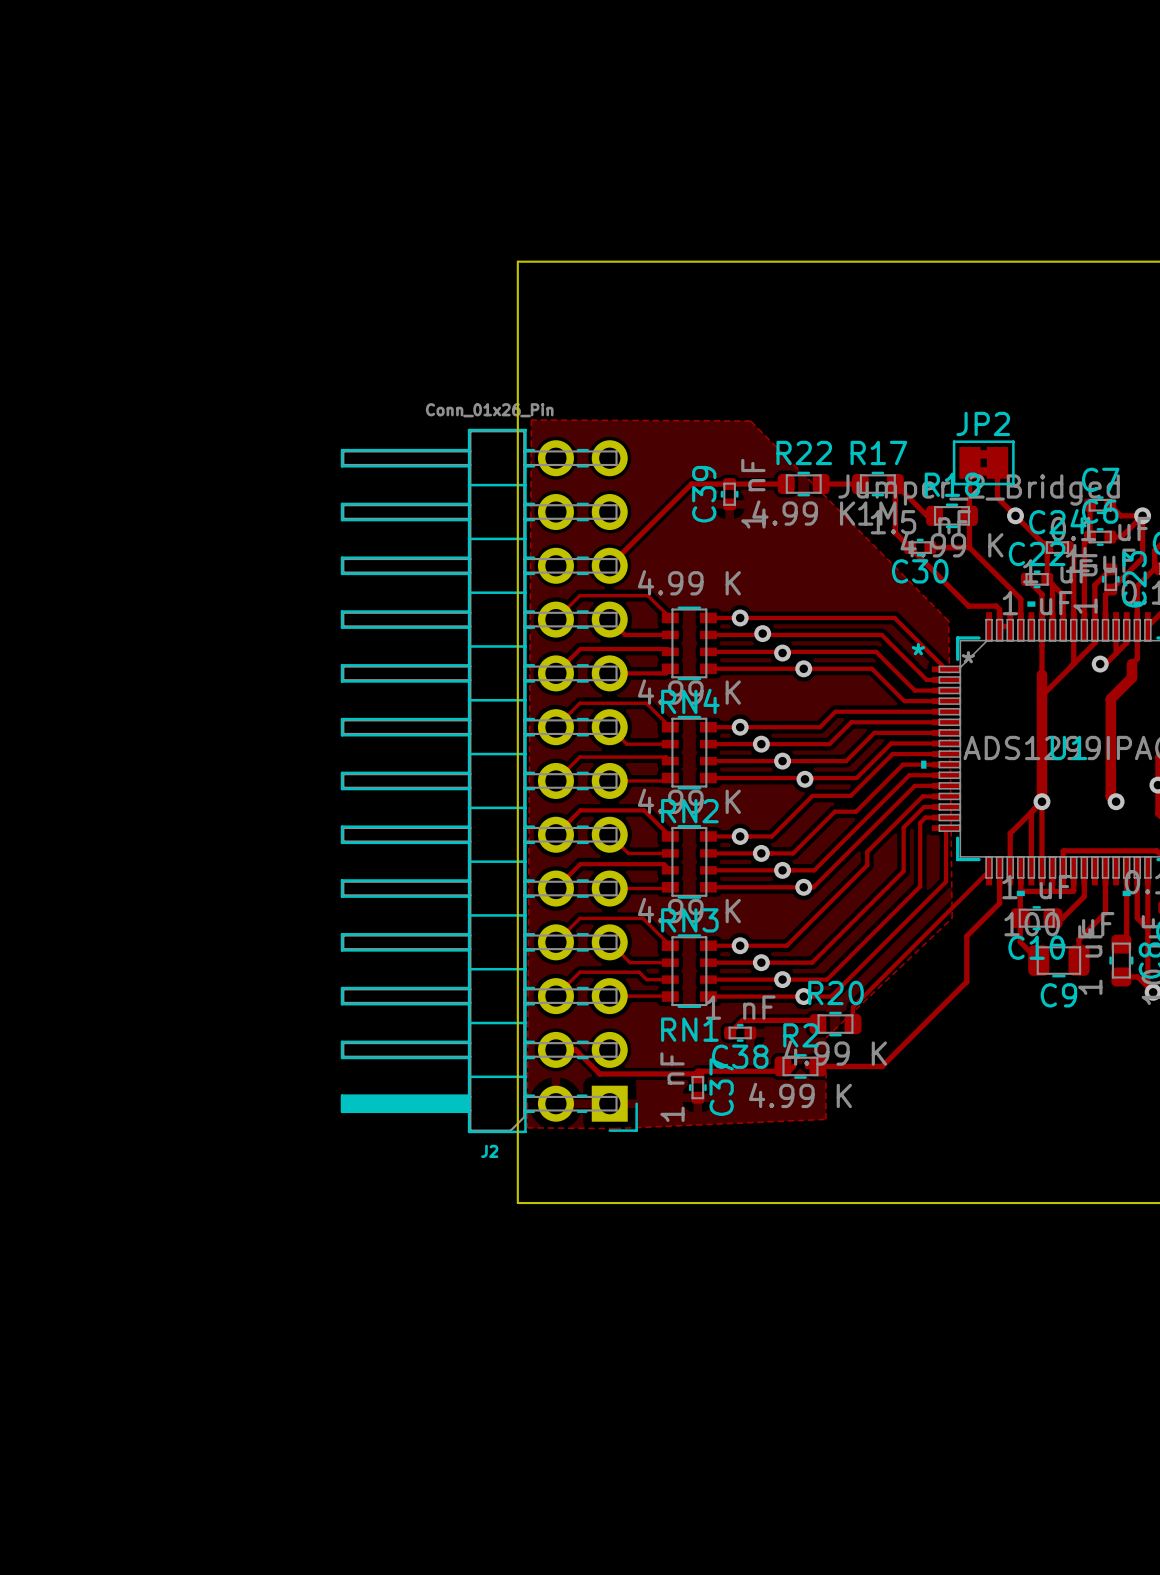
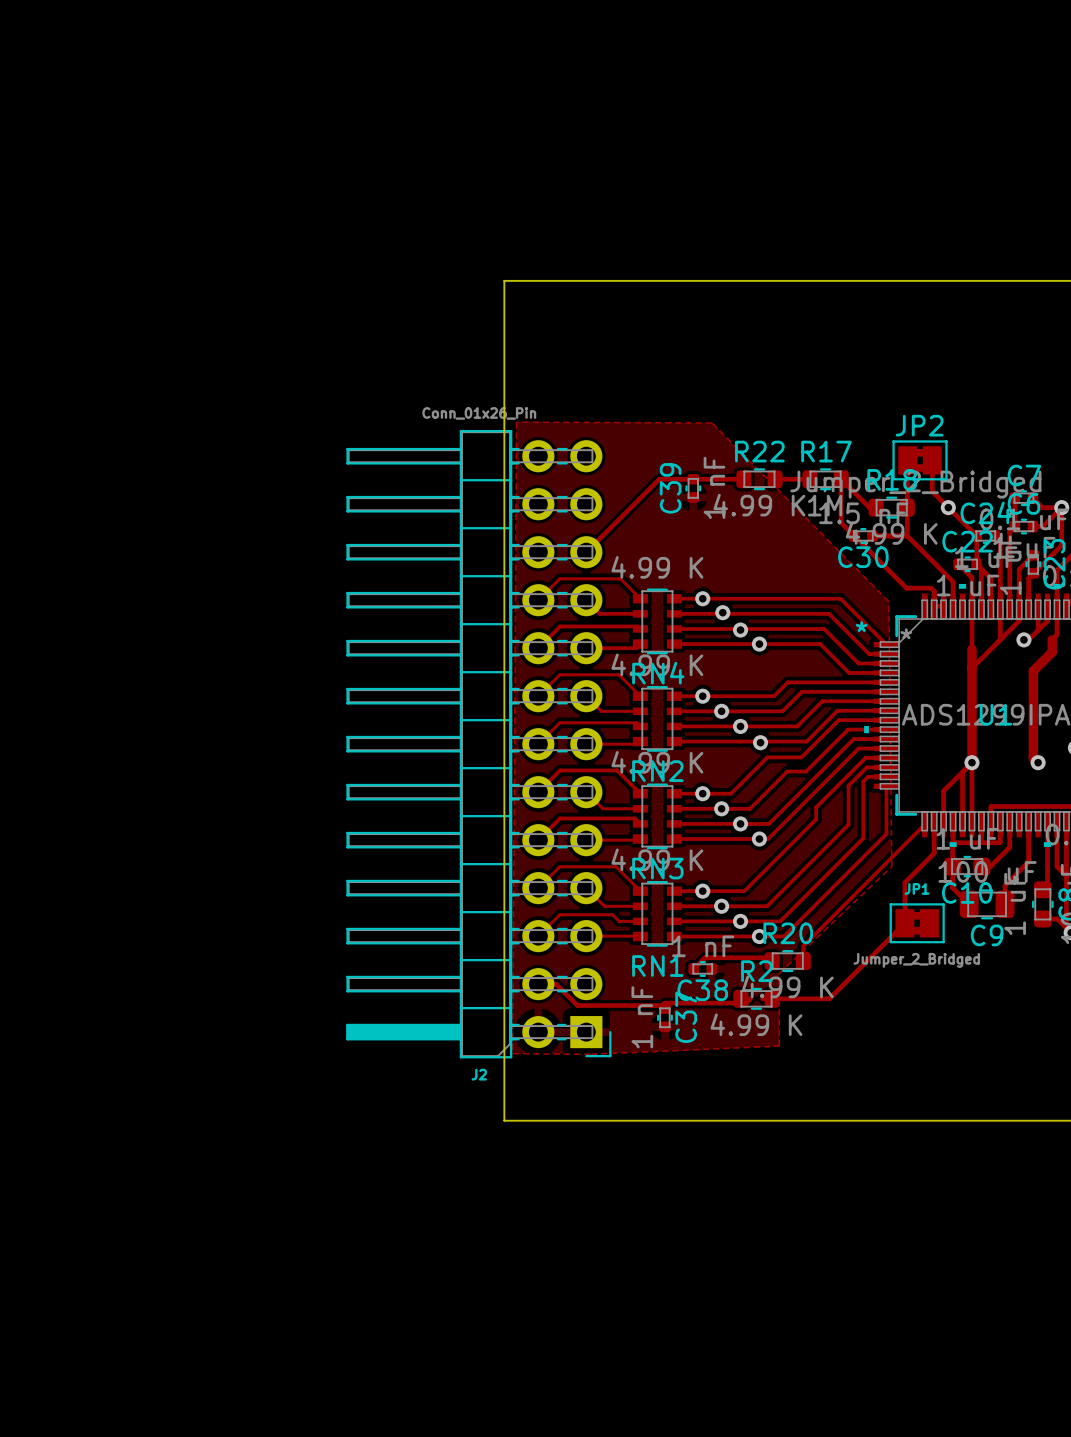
JP1: none -> Jumper_2_Bridged (917, 923)

